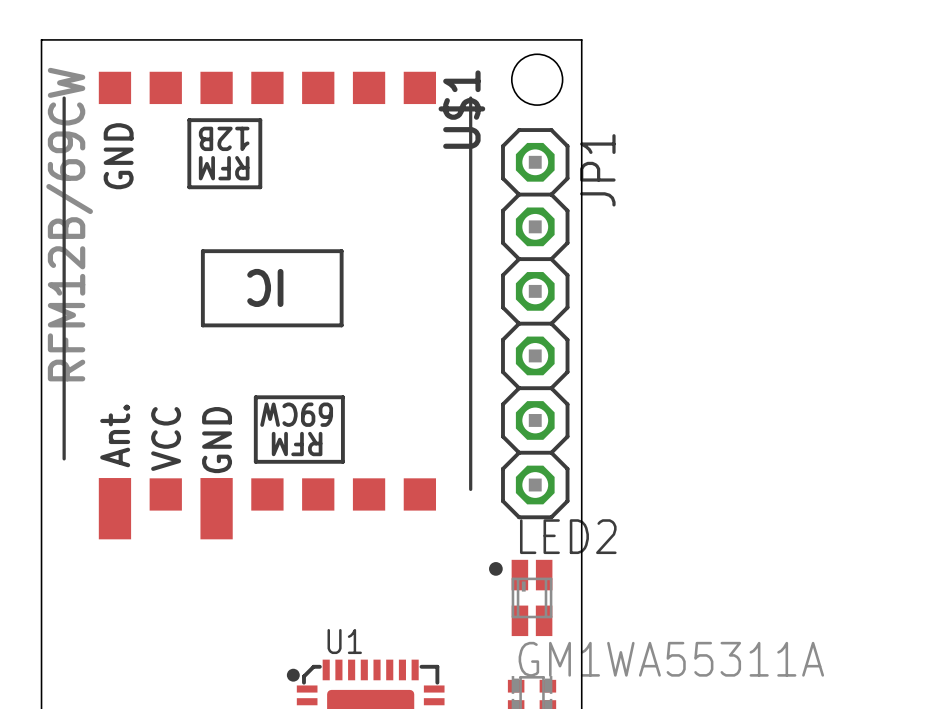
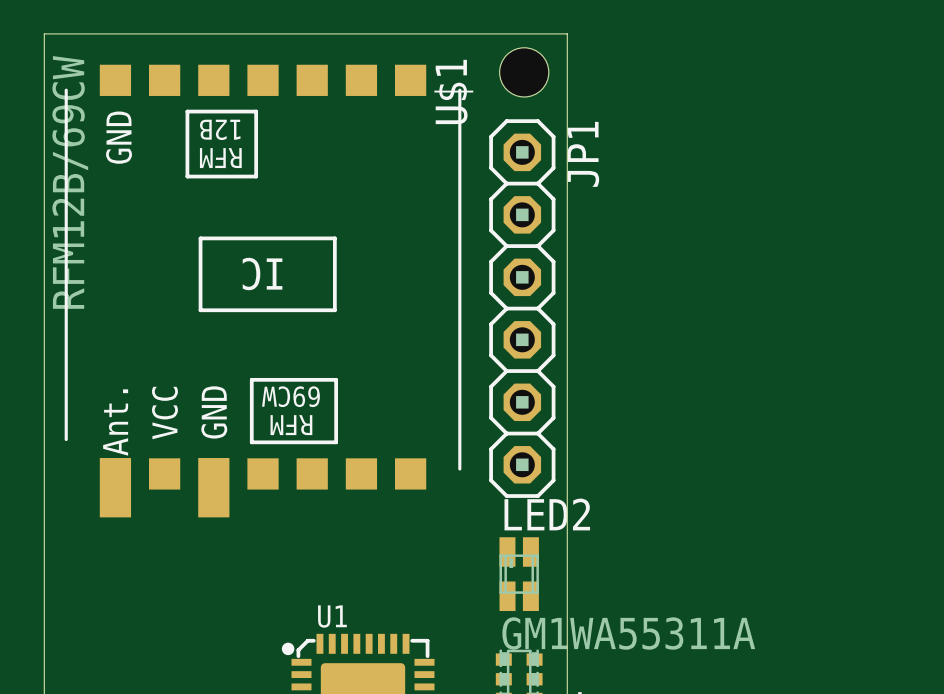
drawing: [489, 562, 503, 576] -> none

